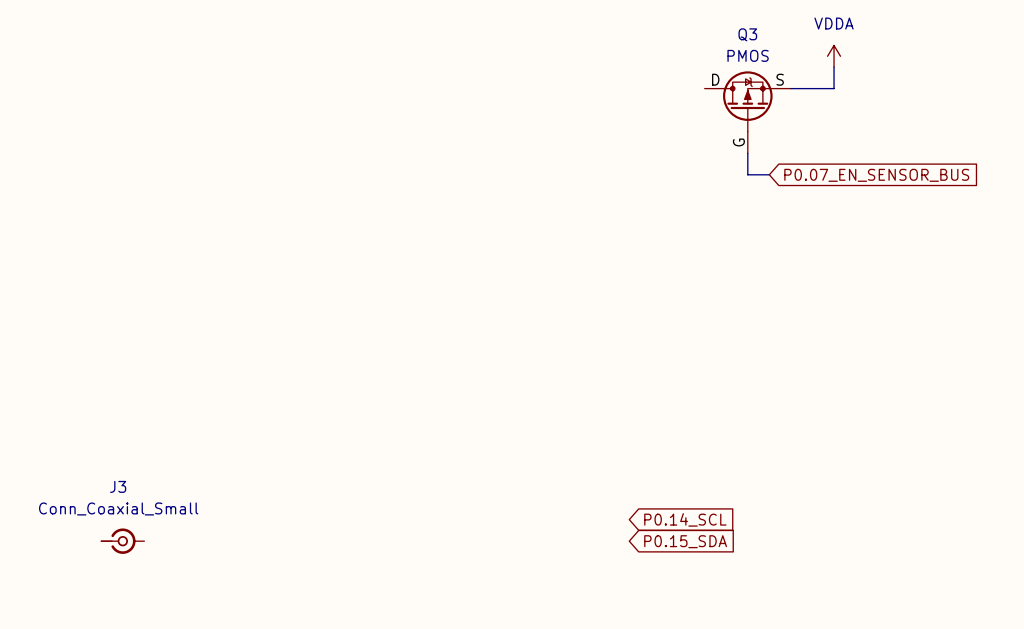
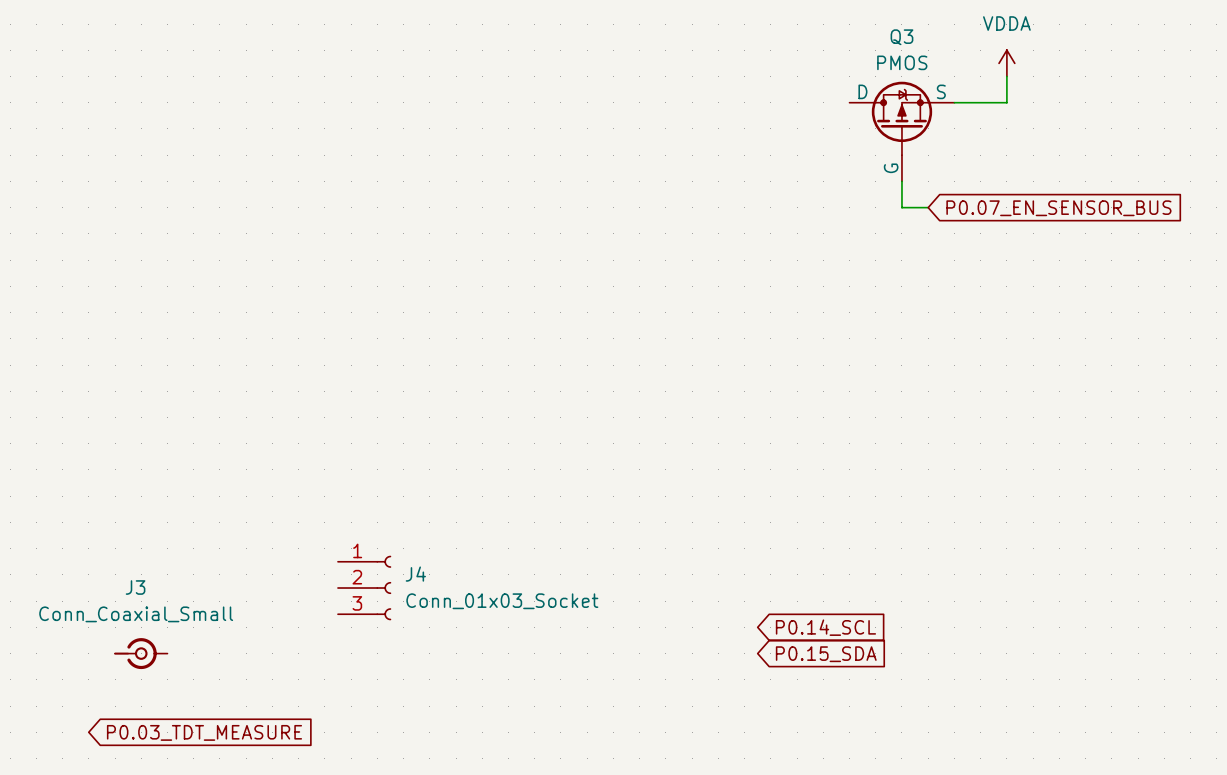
J4: none -> Conn_01x03_Socket (364, 588)
global label: none -> P0.03_TDT_MEASURE (204, 732)

